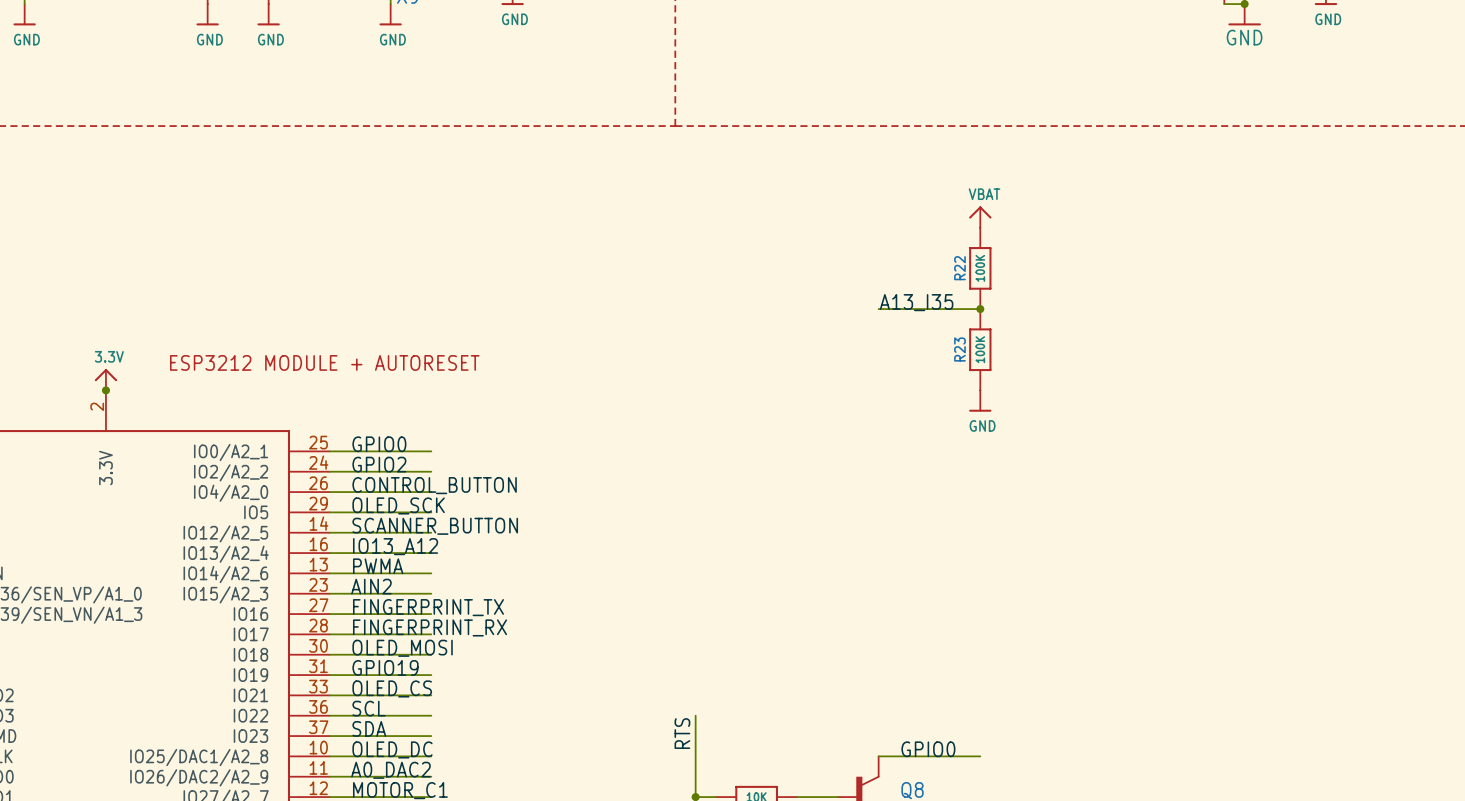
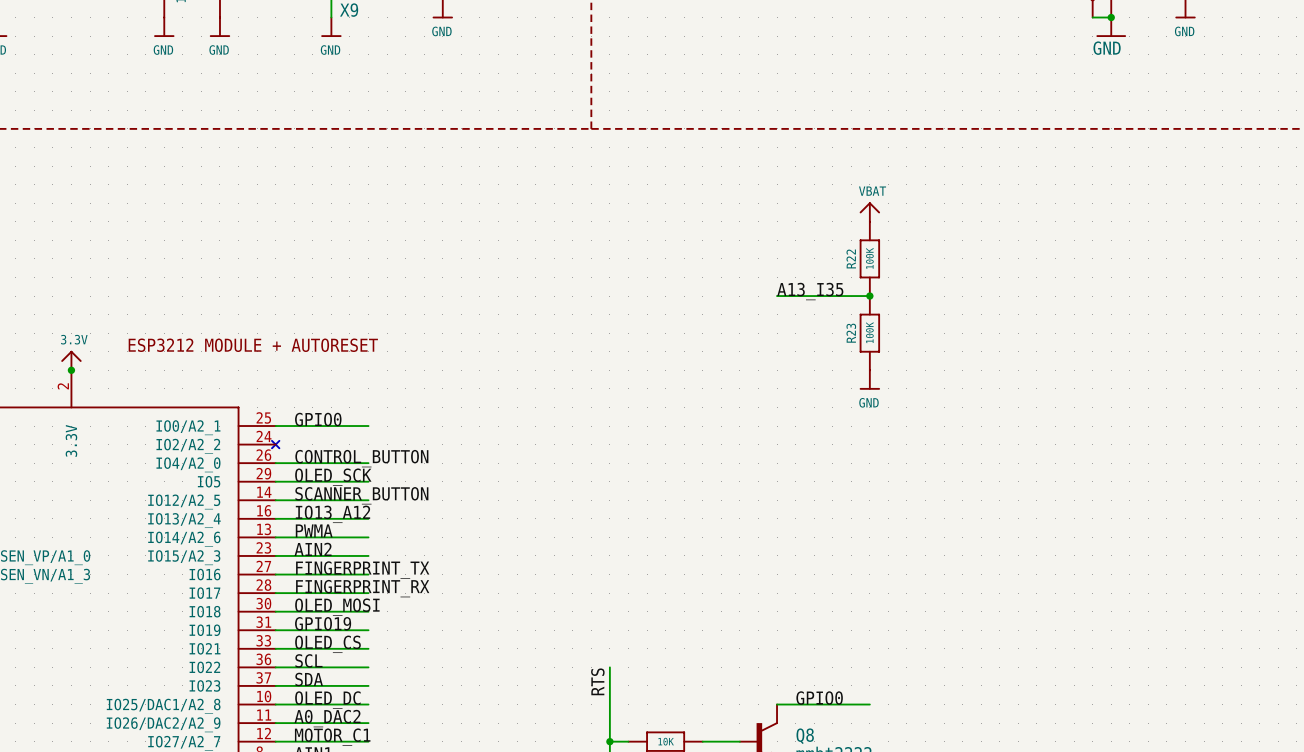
label: GPIO2 (379, 464) -> none
wire: (329, 471) (431, 471) -> none
part: none -> (275, 444)

